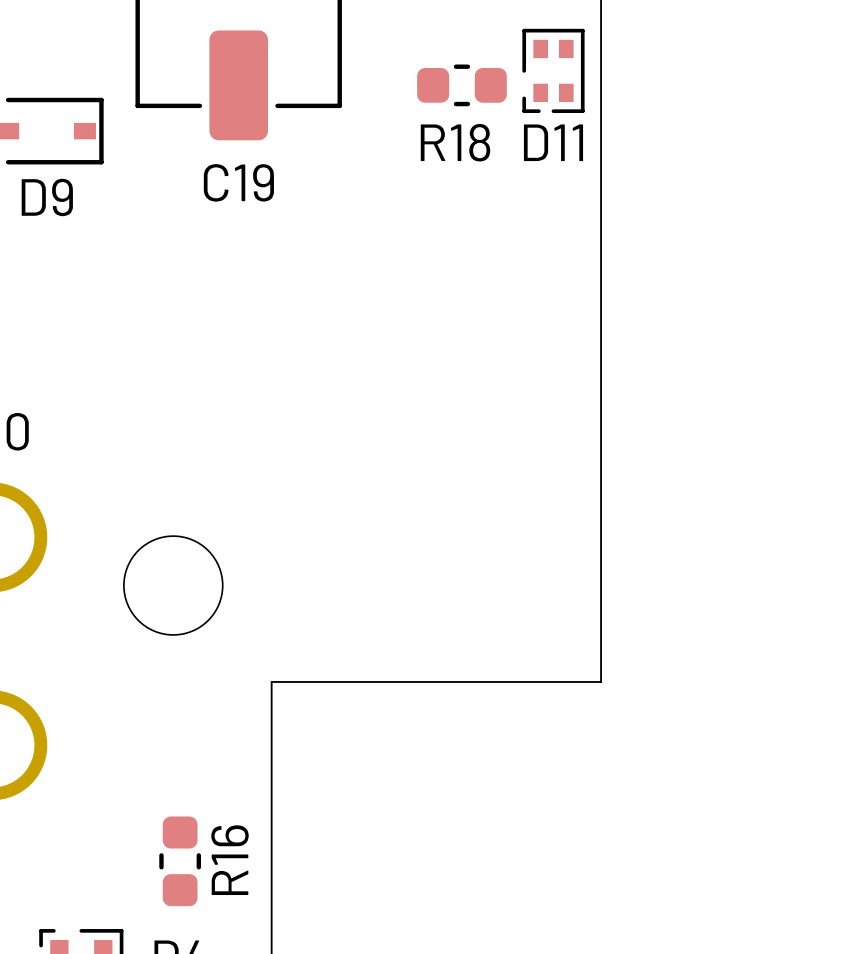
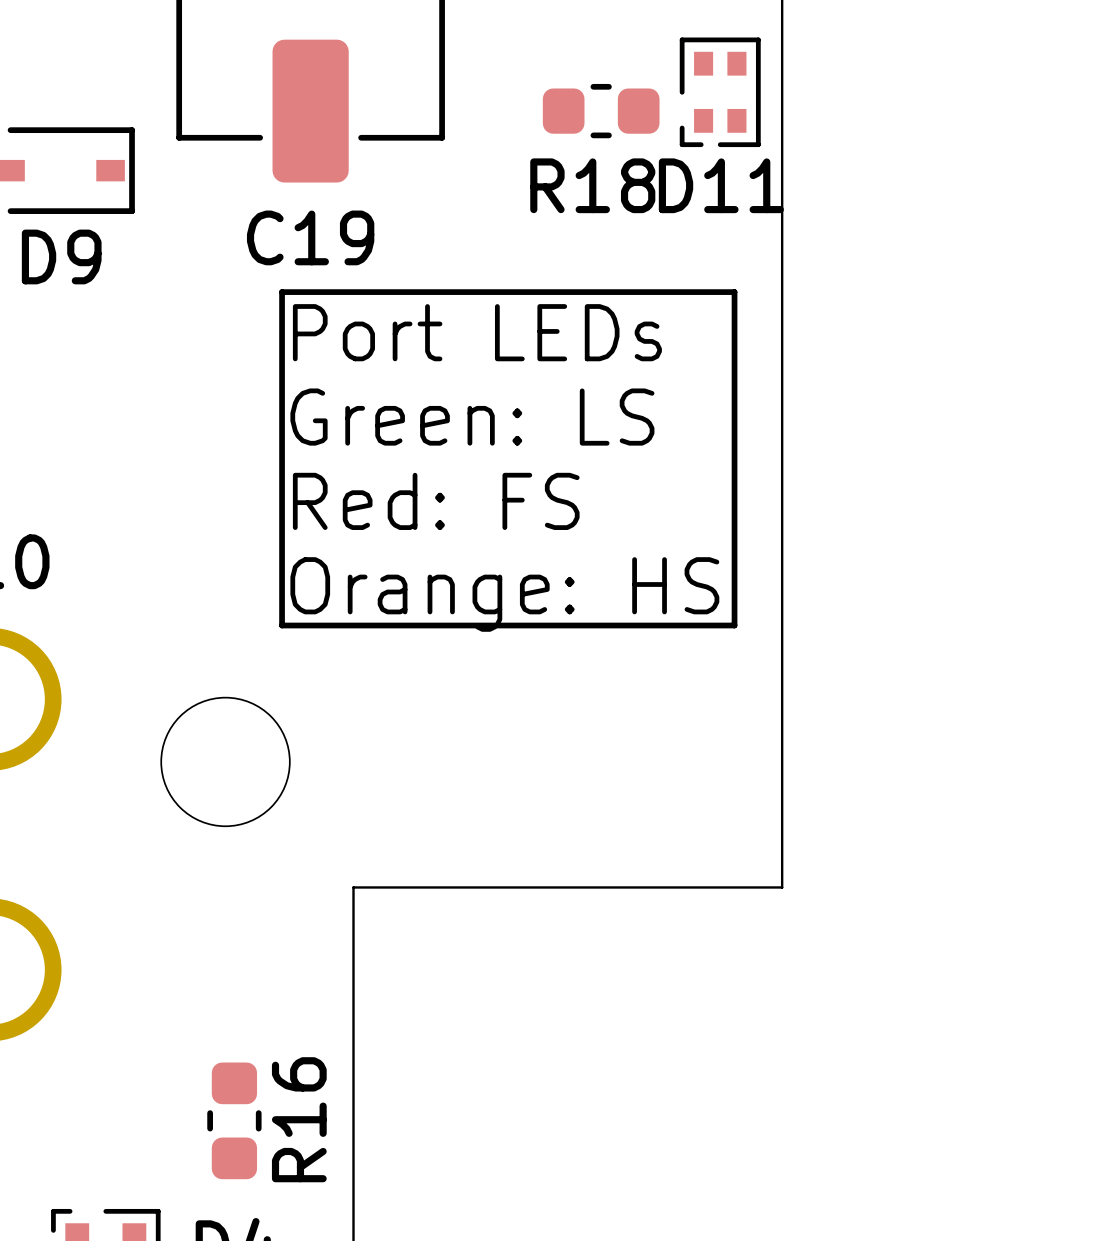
line: none -> (282, 292) (282, 625) (734, 625) (734, 292) (282, 292)
text: none -> Port LEDs (477, 332)
text: none -> Green: LS (472, 417)
text: none -> Red: FS (436, 501)
text: none -> Orange: HS (504, 594)

